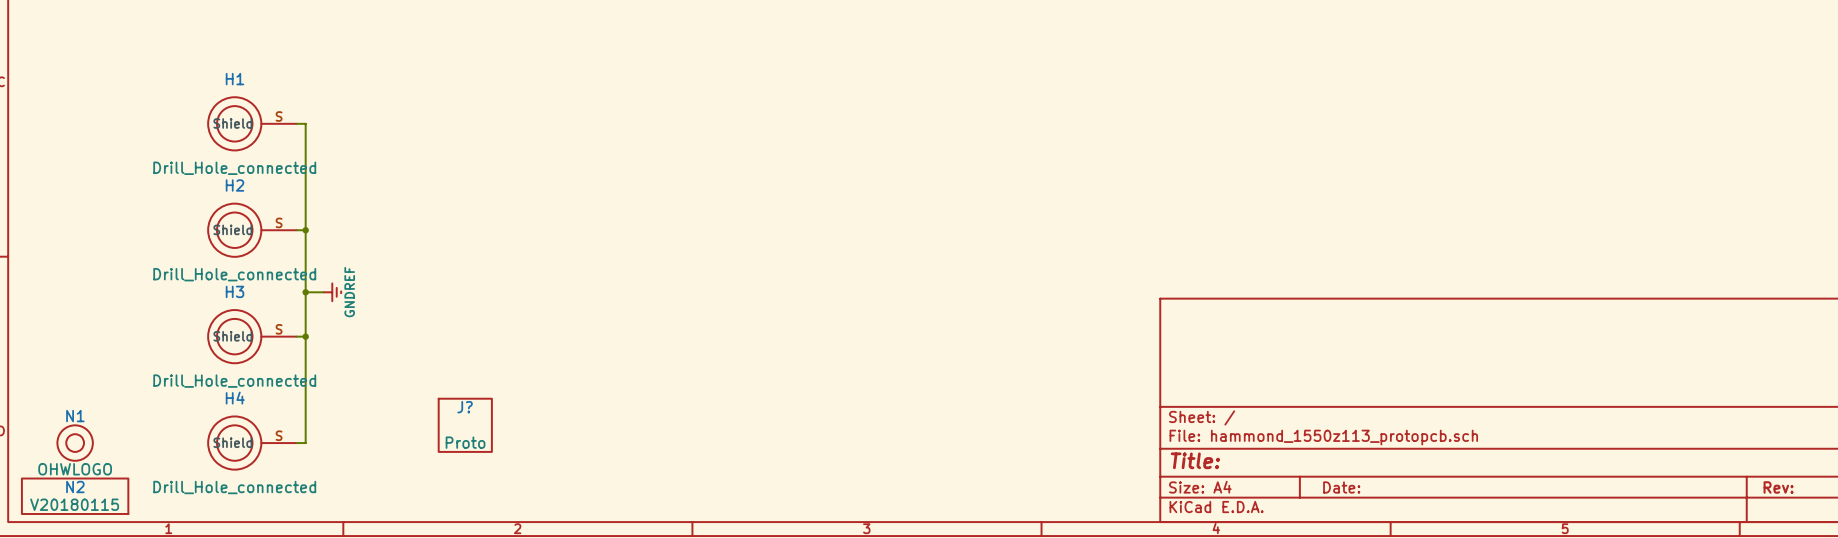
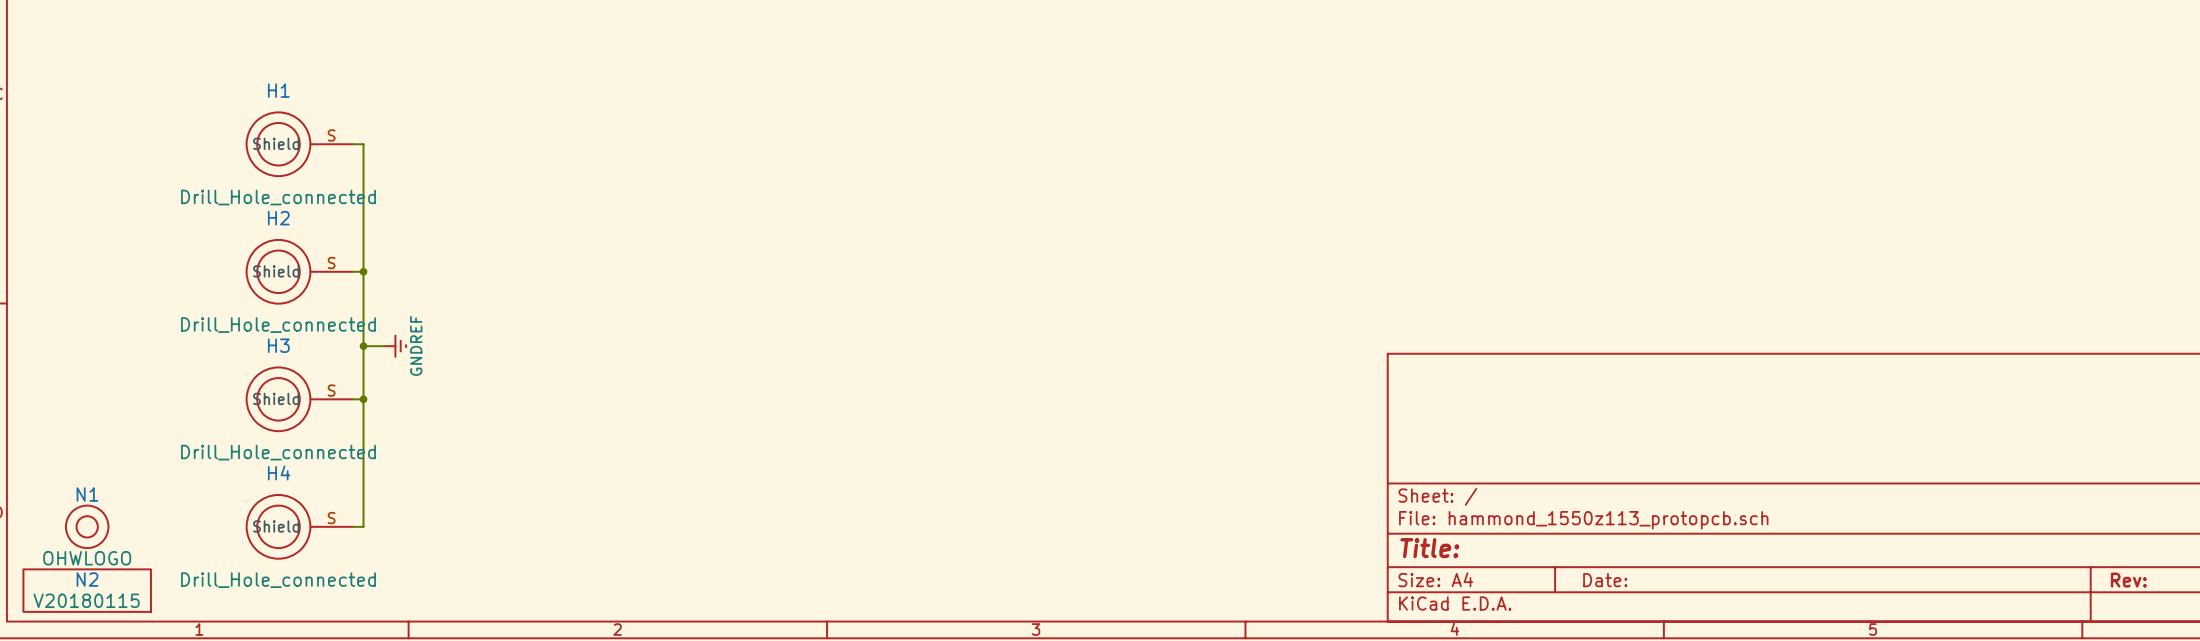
J?: Proto (465, 425) -> none

